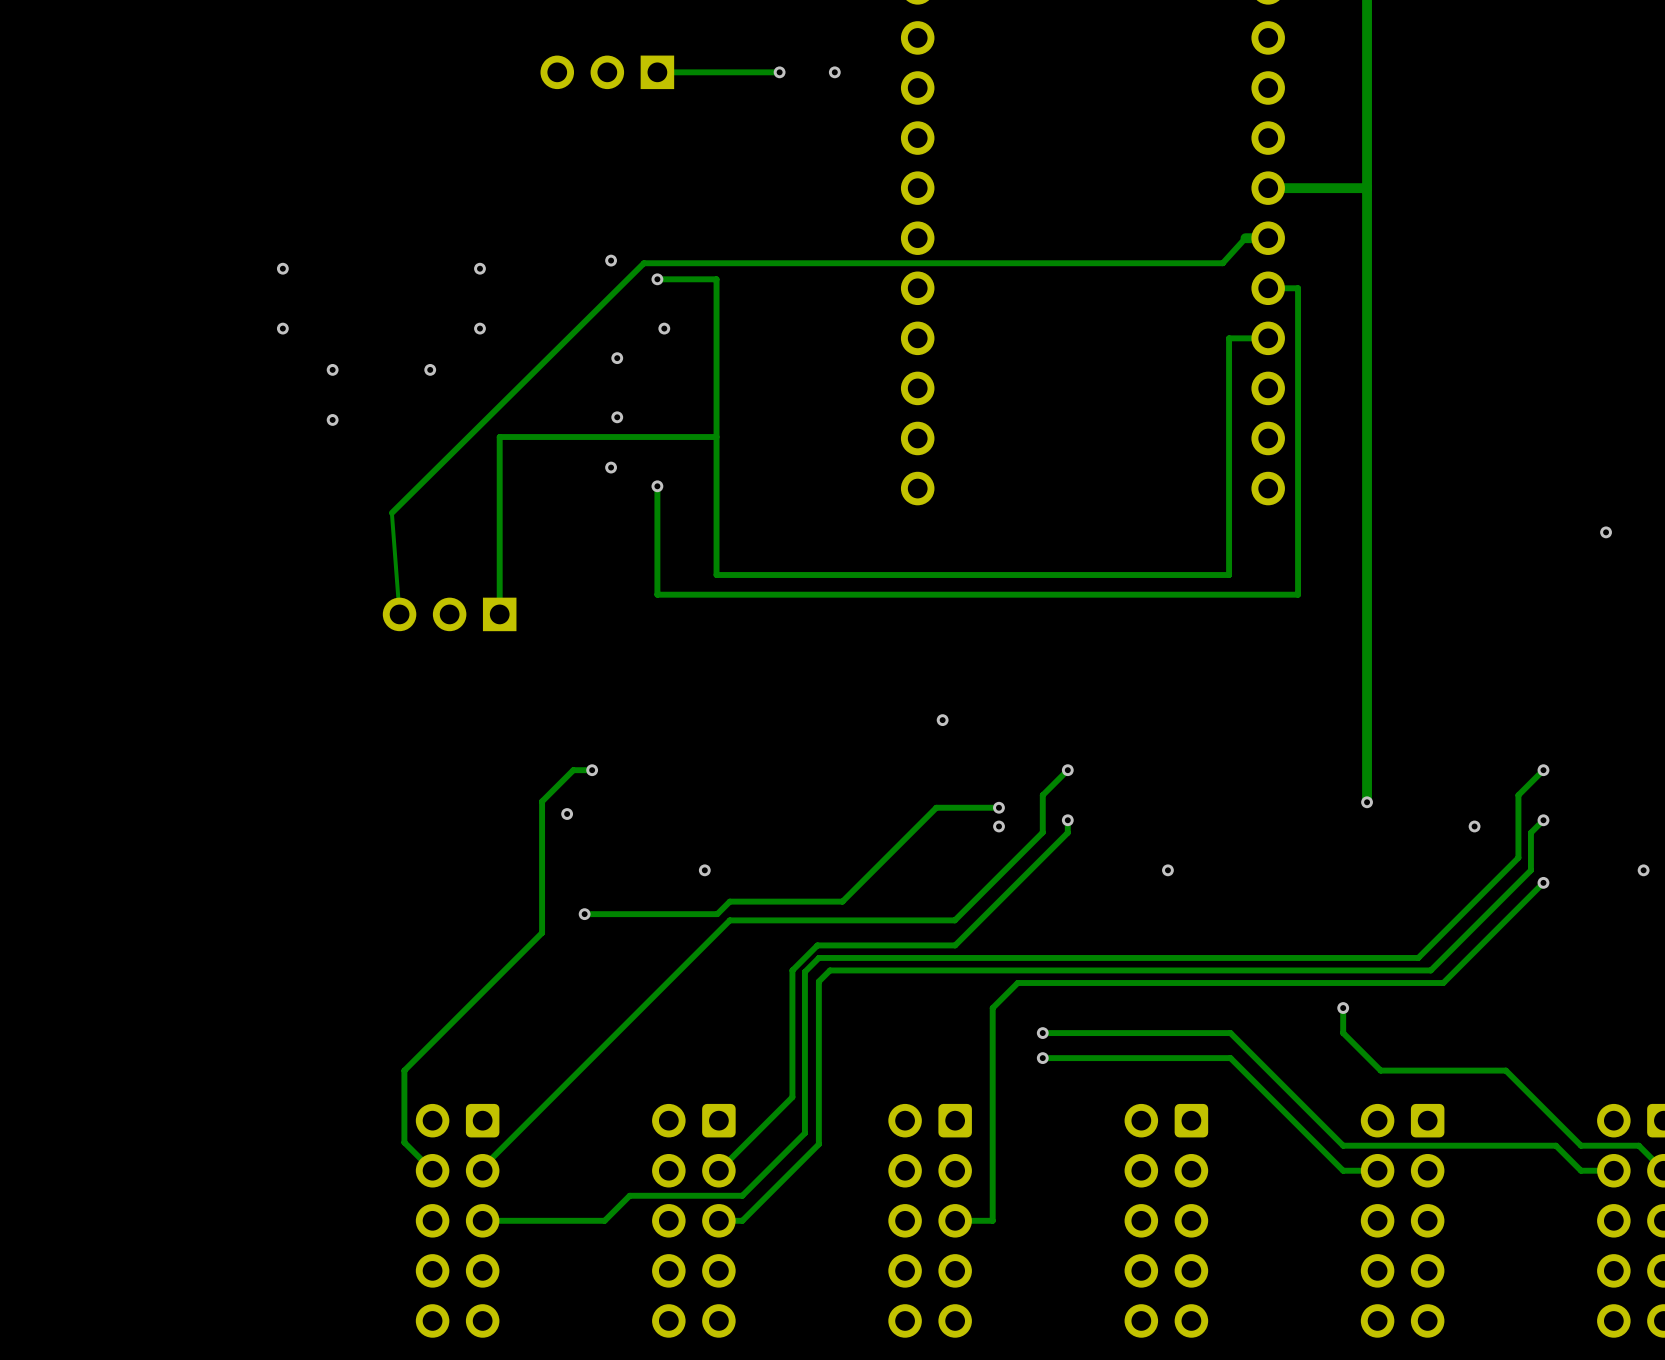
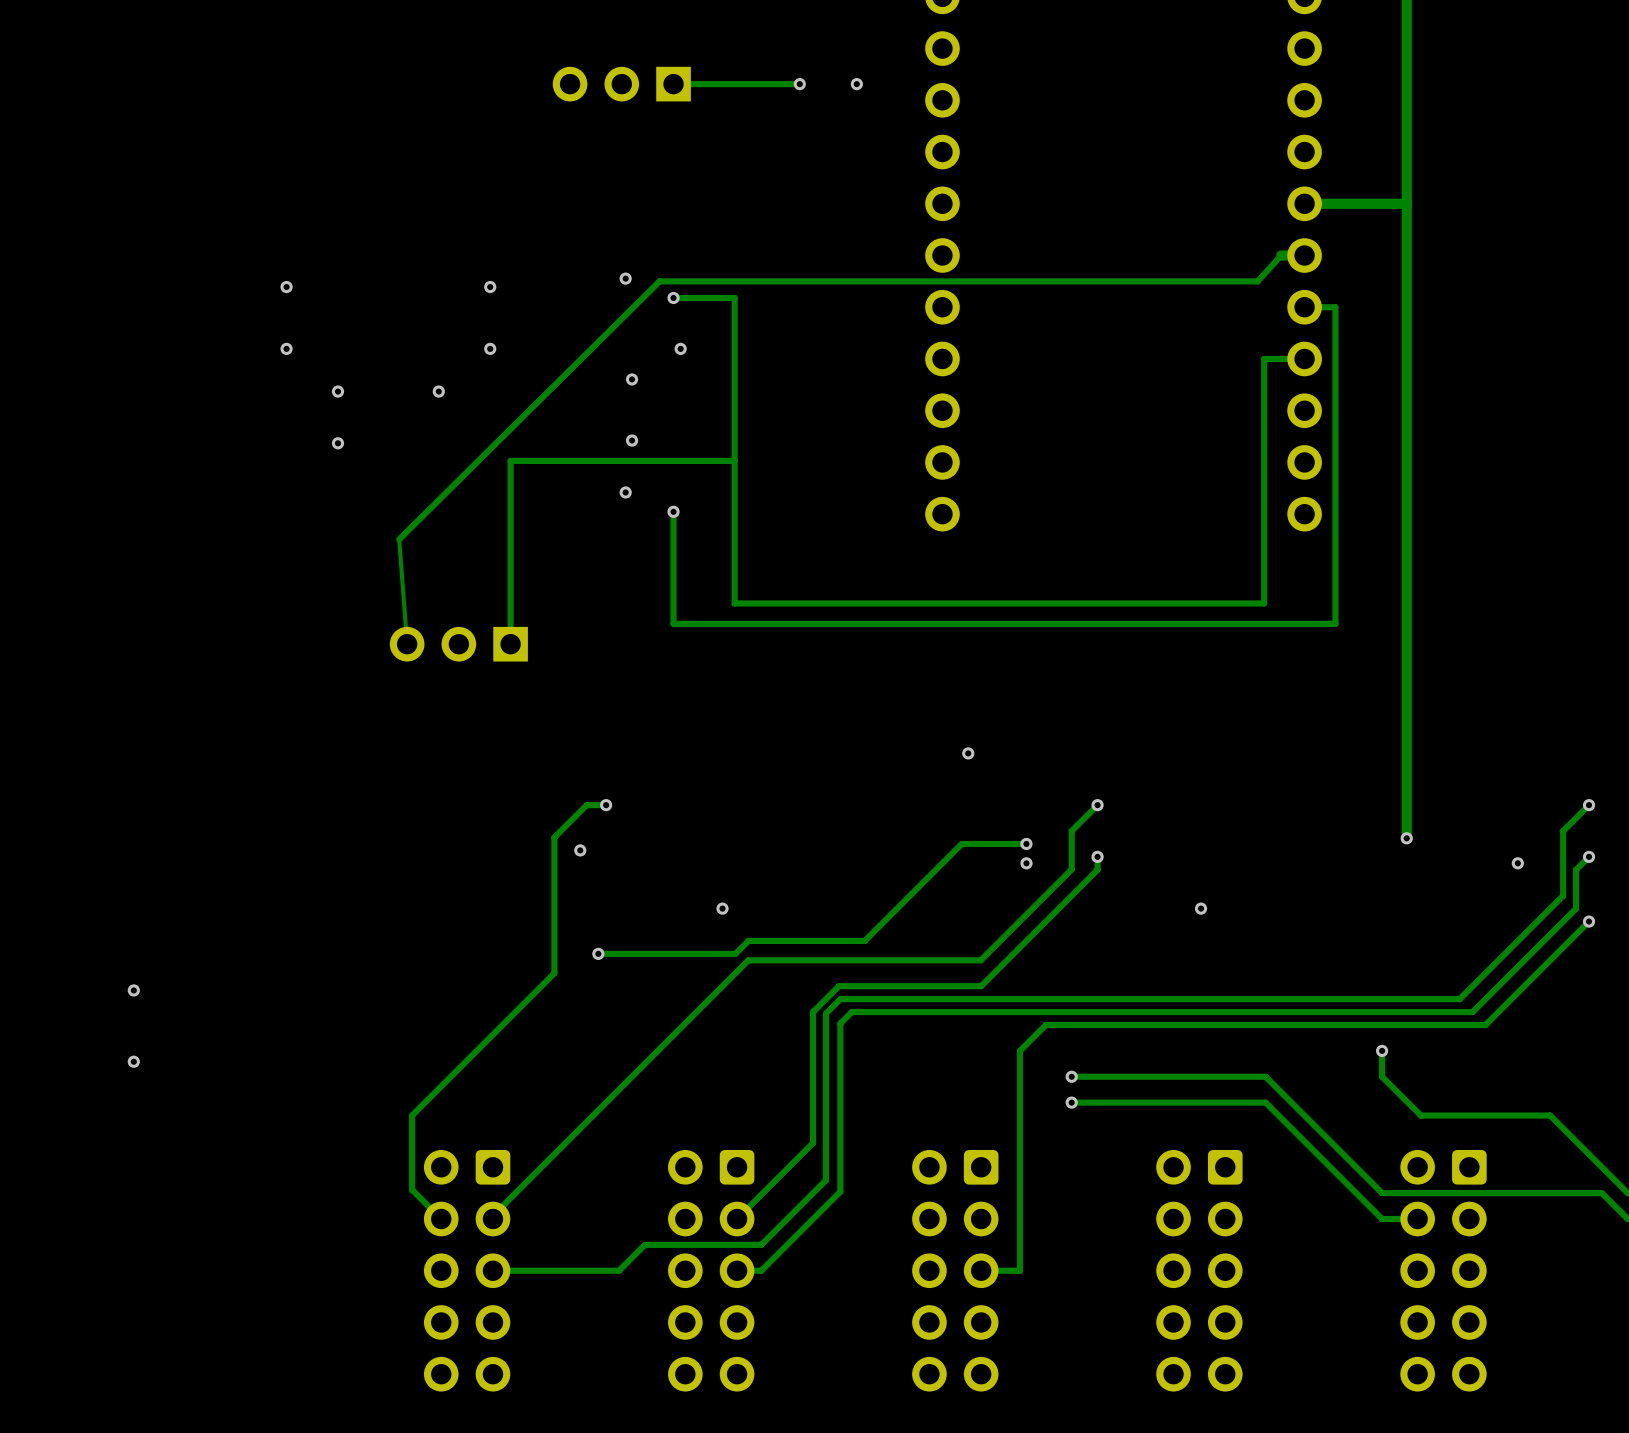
via: none -> (133, 990)
via: none -> (133, 1061)

